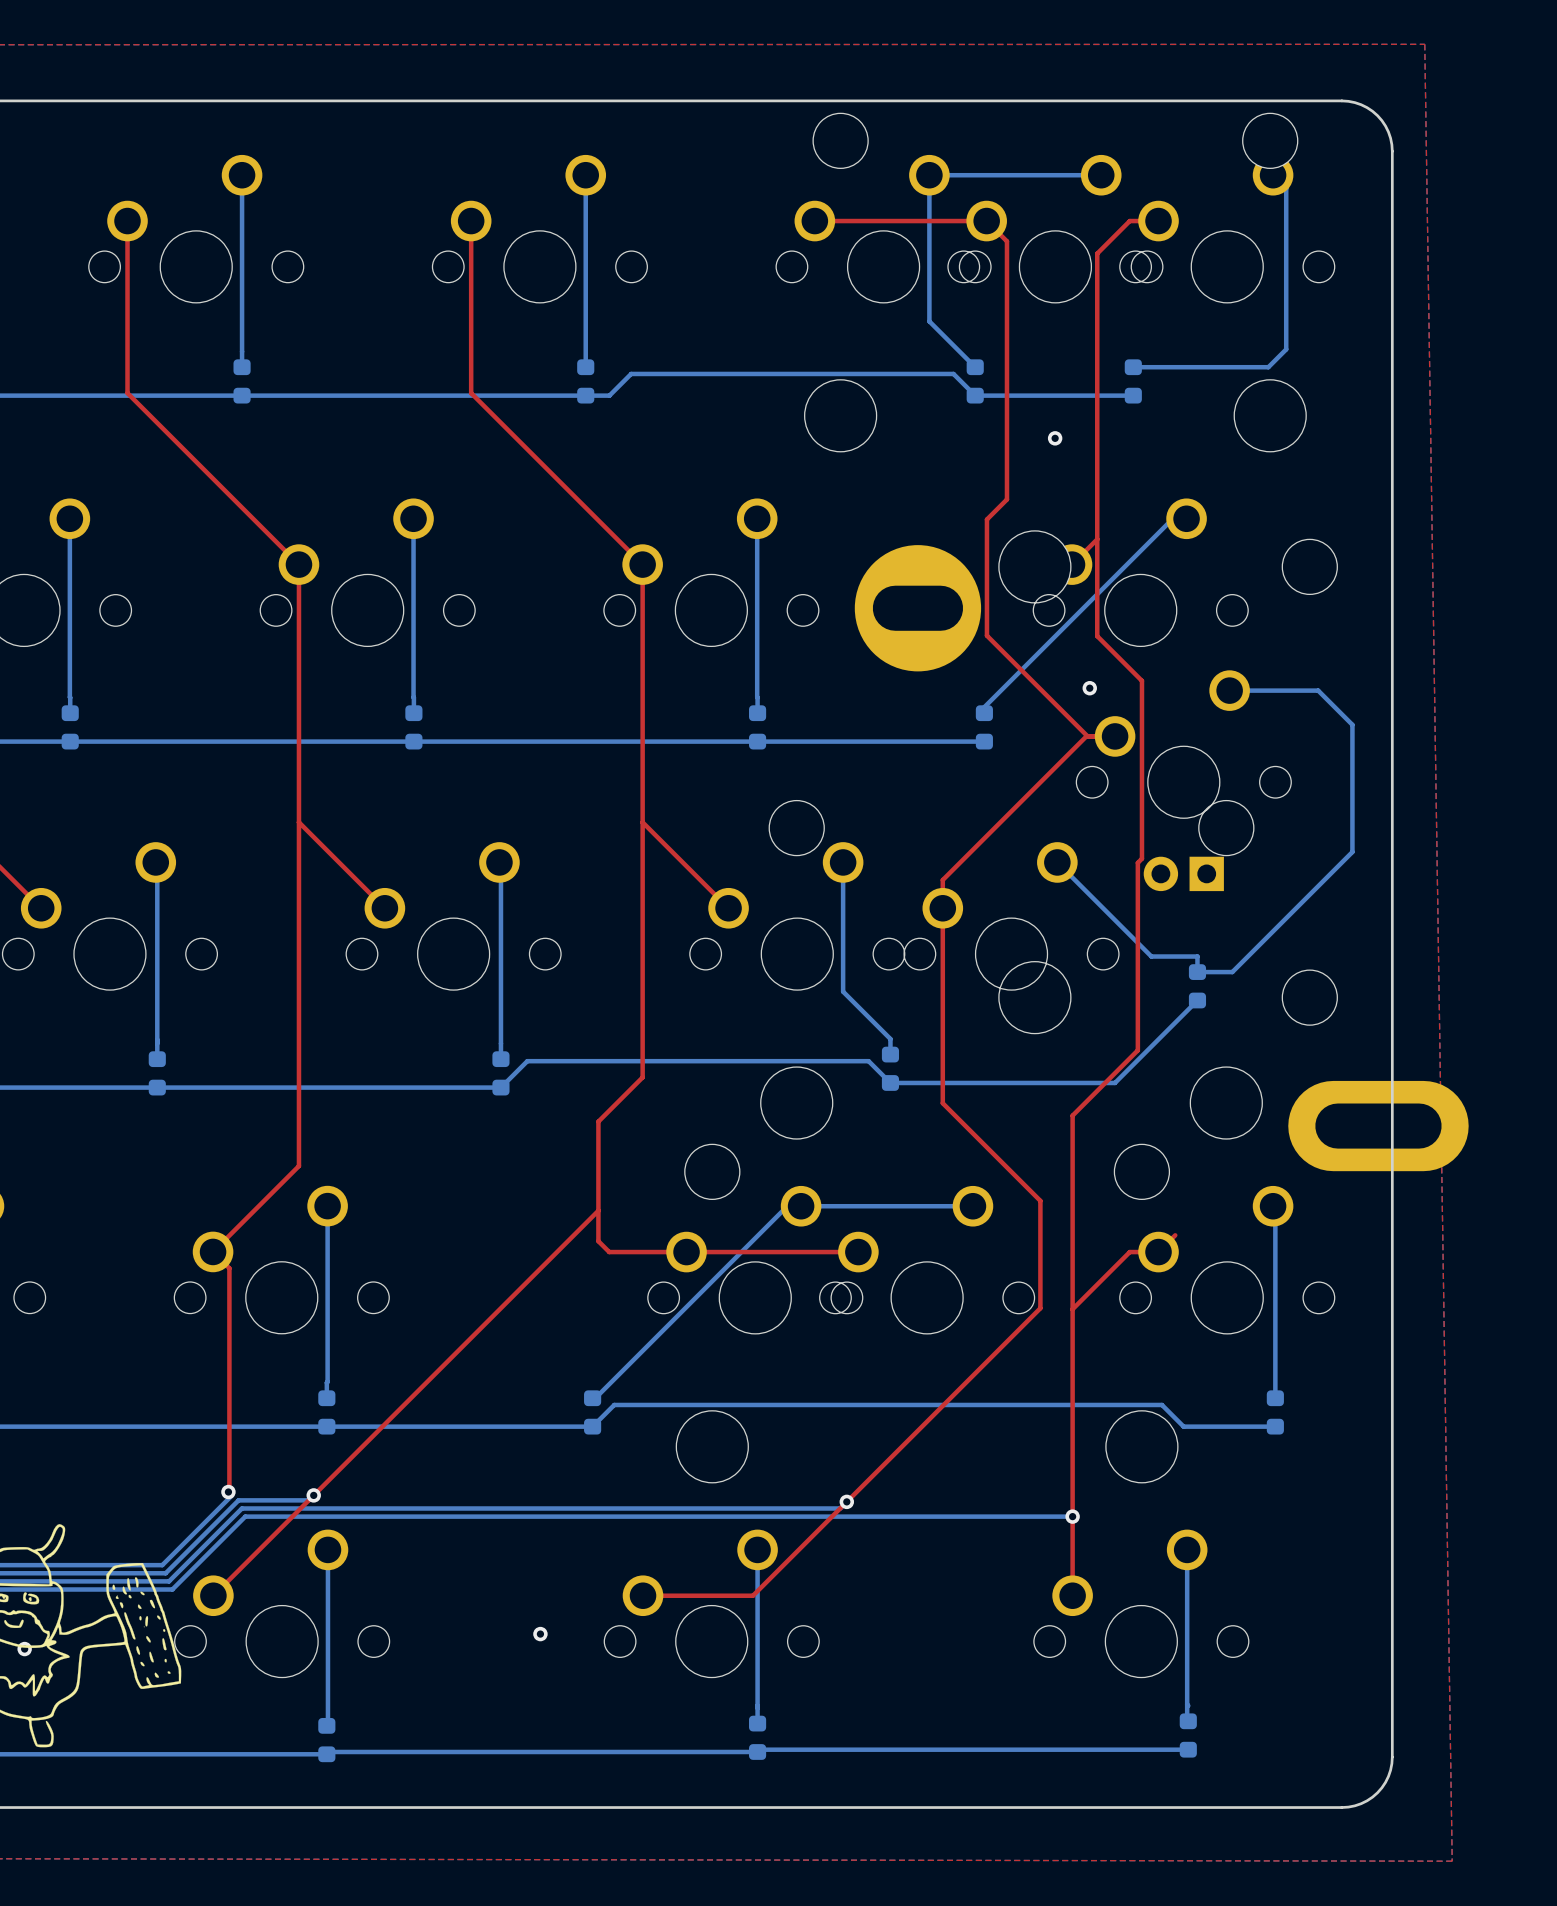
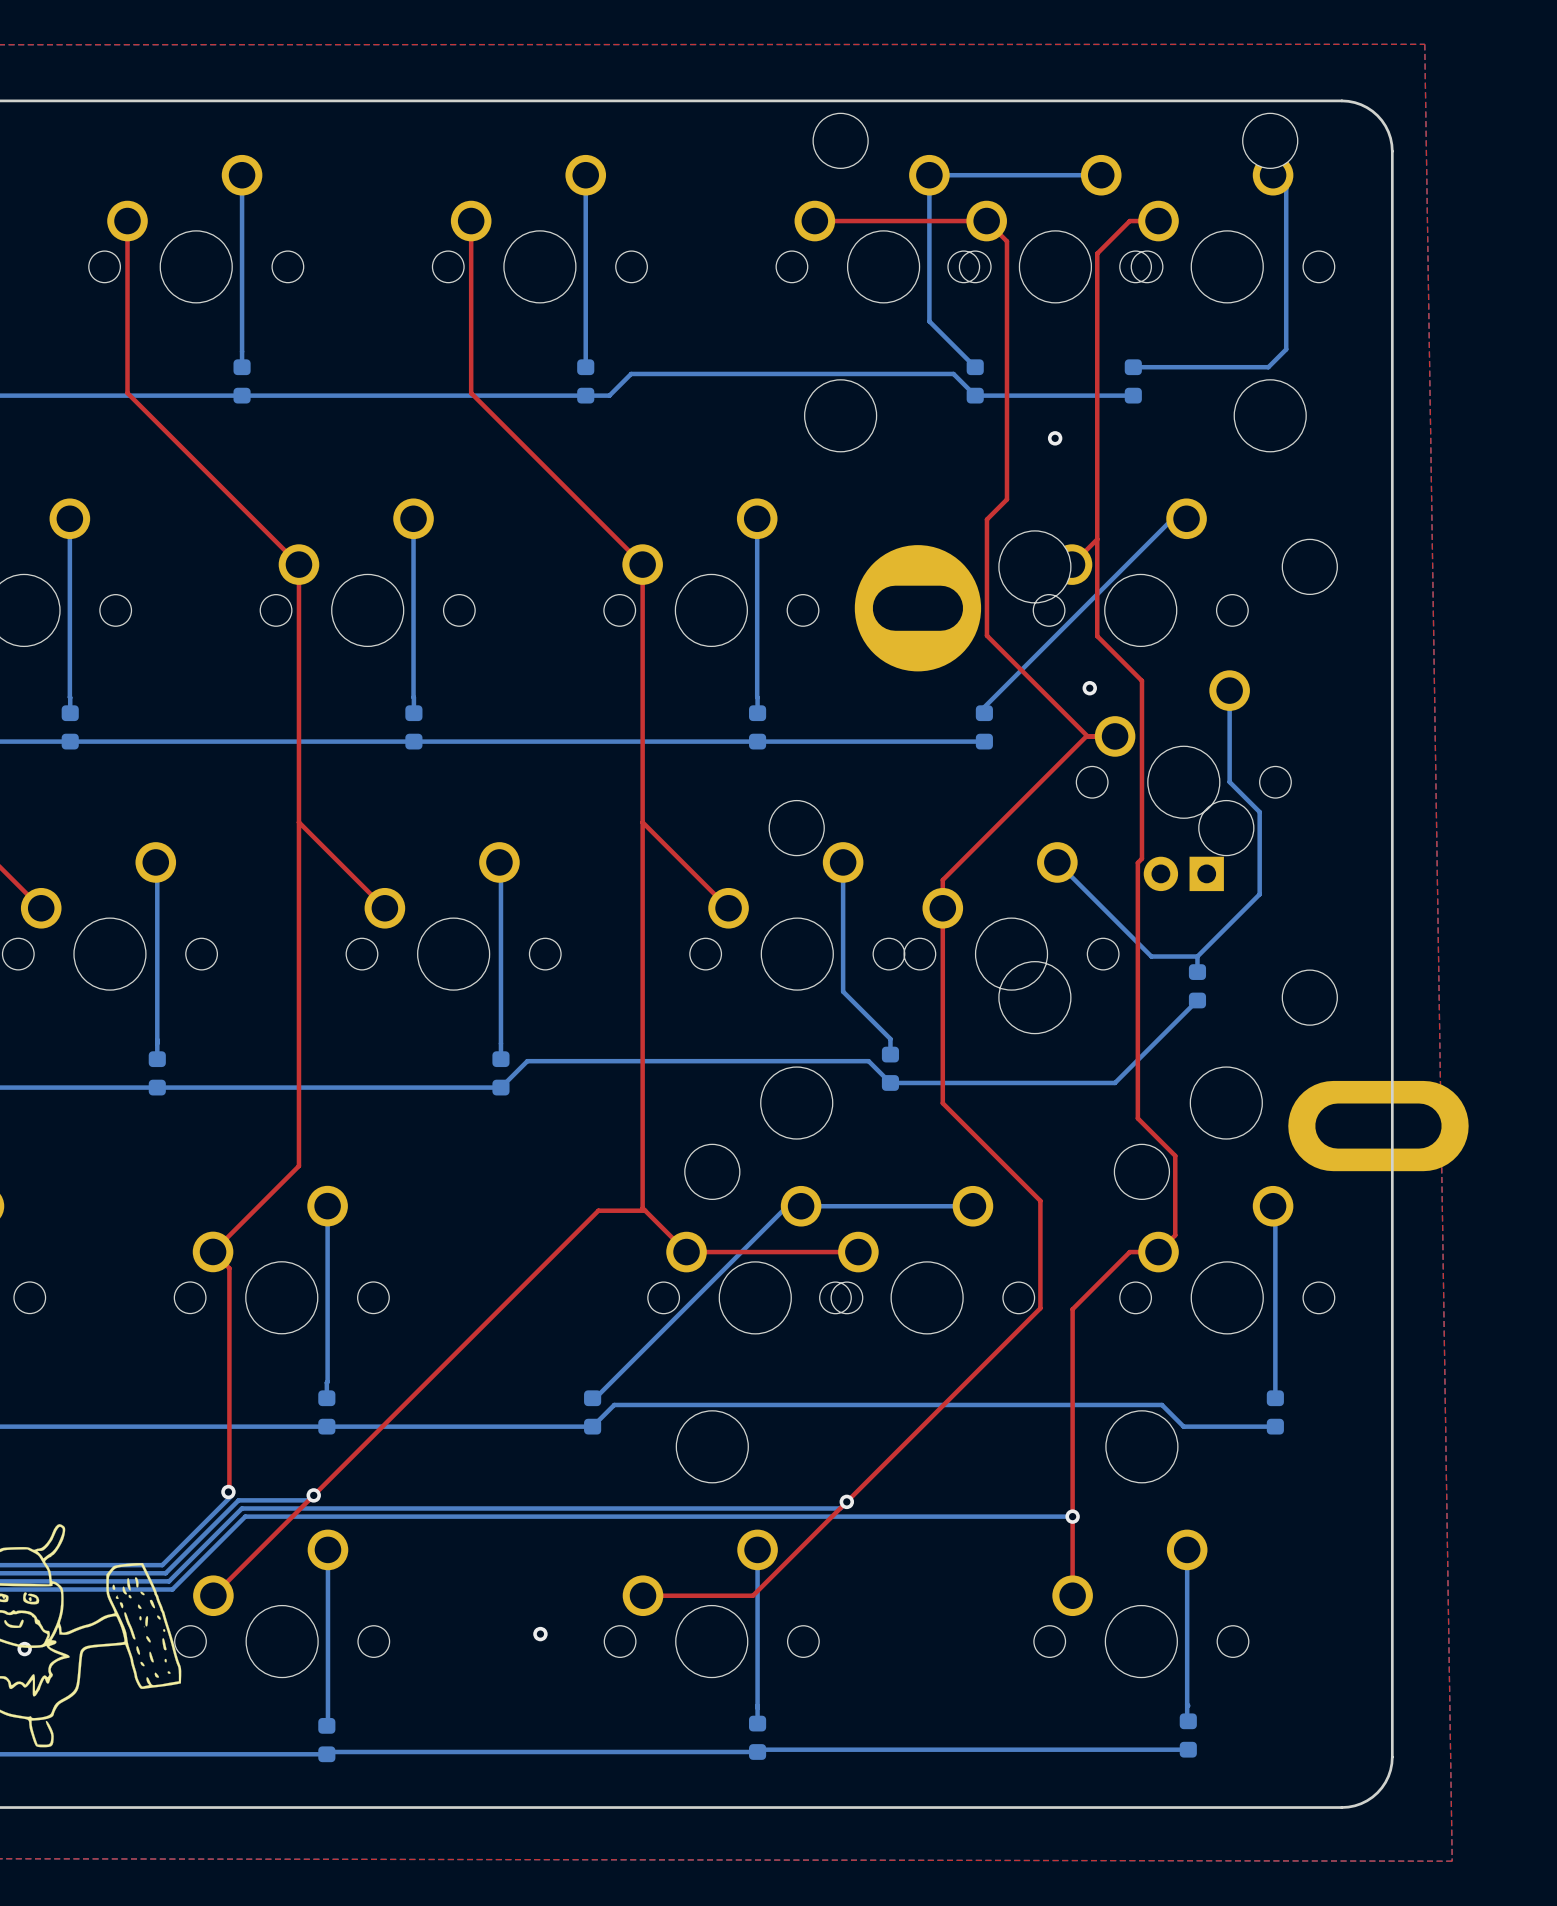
bottom track: (1229, 690) (1318, 690) (1352, 724) (1352, 852) (1232, 972) (1197, 972) -> (1229, 690) (1229, 782) (1259, 812) (1259, 894) (1197, 956)
top track: (1137, 1050) (1072, 1115) (1072, 1309) -> (1137, 1050) (1137, 1118) (1175, 1155) (1175, 1235)
top track: (642, 1077) (598, 1121) (598, 1241) (609, 1252) (686, 1252) -> (642, 1077) (642, 1208) (686, 1252)
top track: none -> (598, 1210) (645, 1210)

